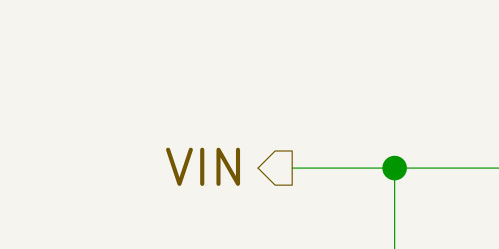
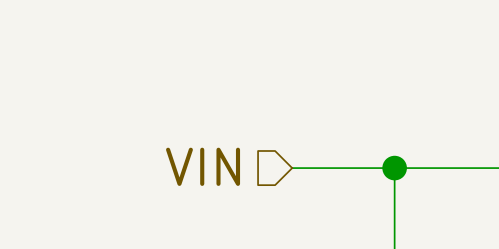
hierarchical label shape: output (203, 166) -> input (203, 166)

